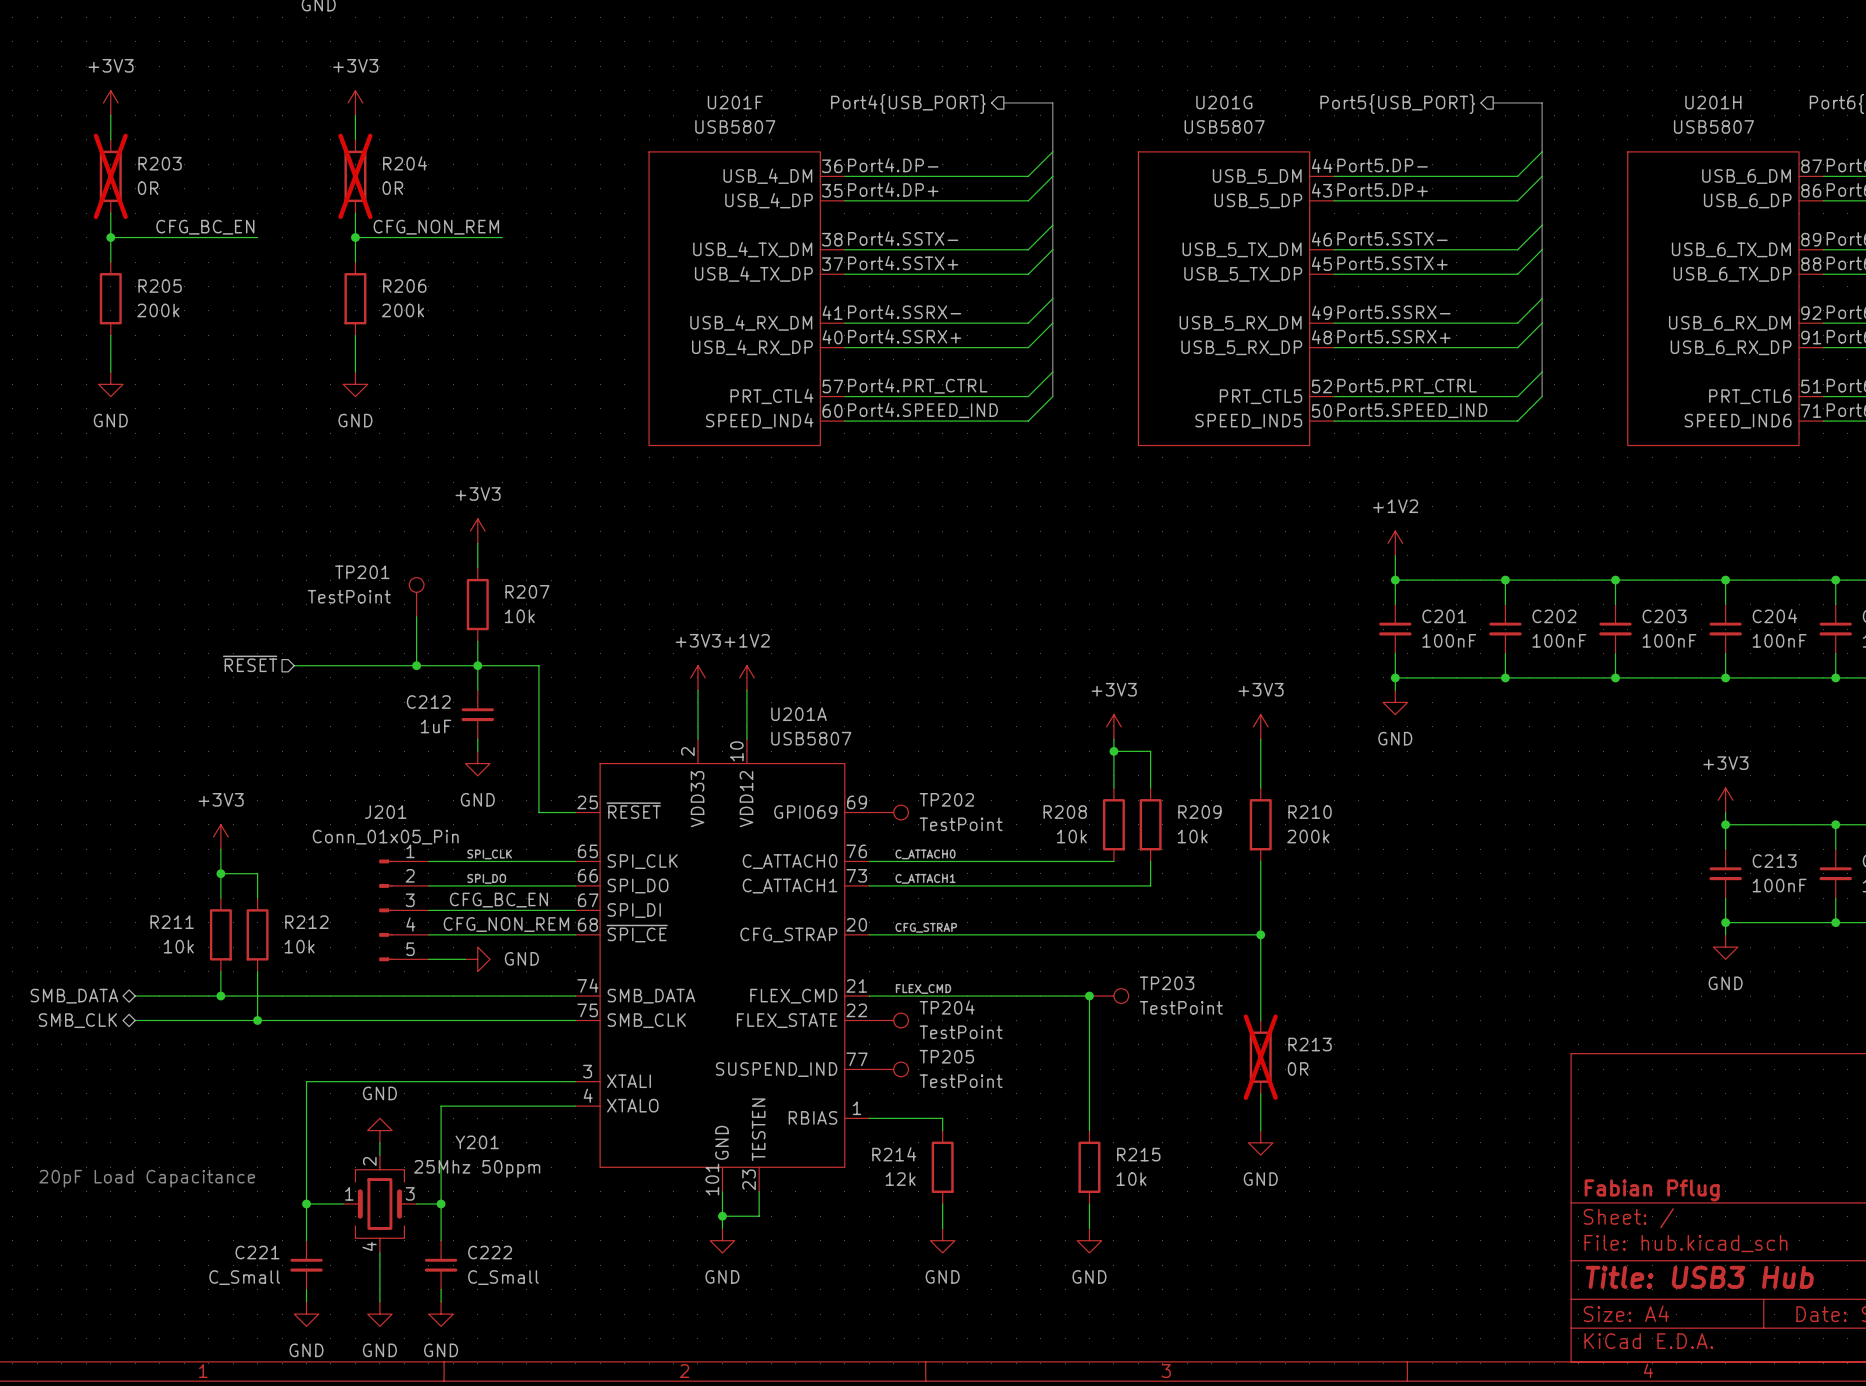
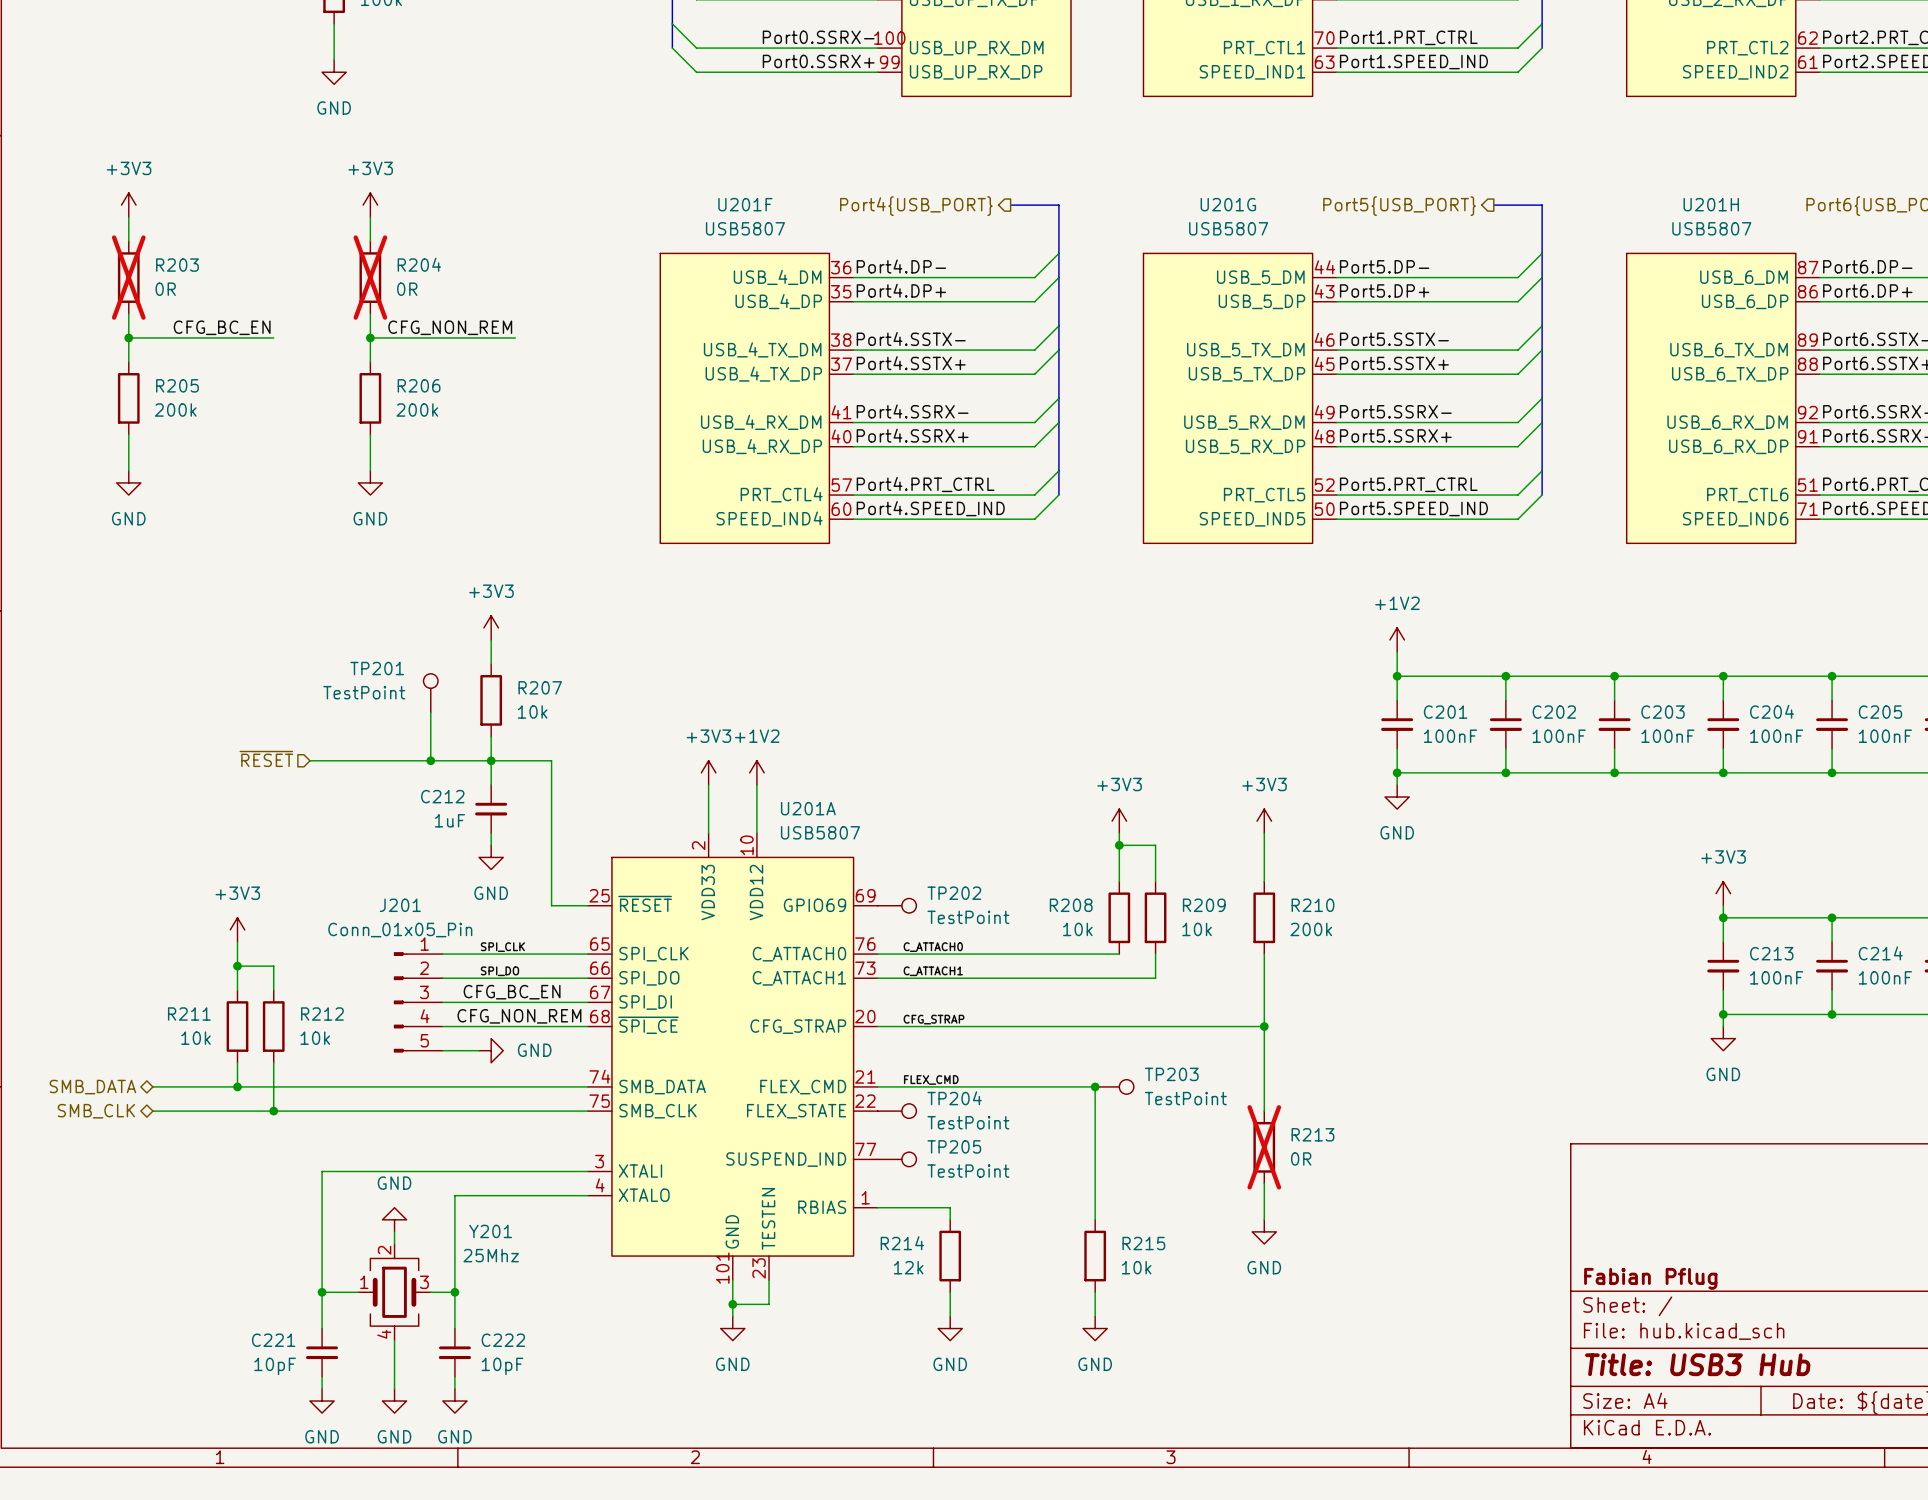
Y201 value: 25Mhz 50ppm (477, 1168) -> 25Mhz (491, 1255)
text: 20pF Load Capacitance (147, 1178) -> none
C221 value: C_Small (244, 1277) -> 10pF (275, 1366)
C222 value: C_Small (503, 1277) -> 10pF (502, 1366)

